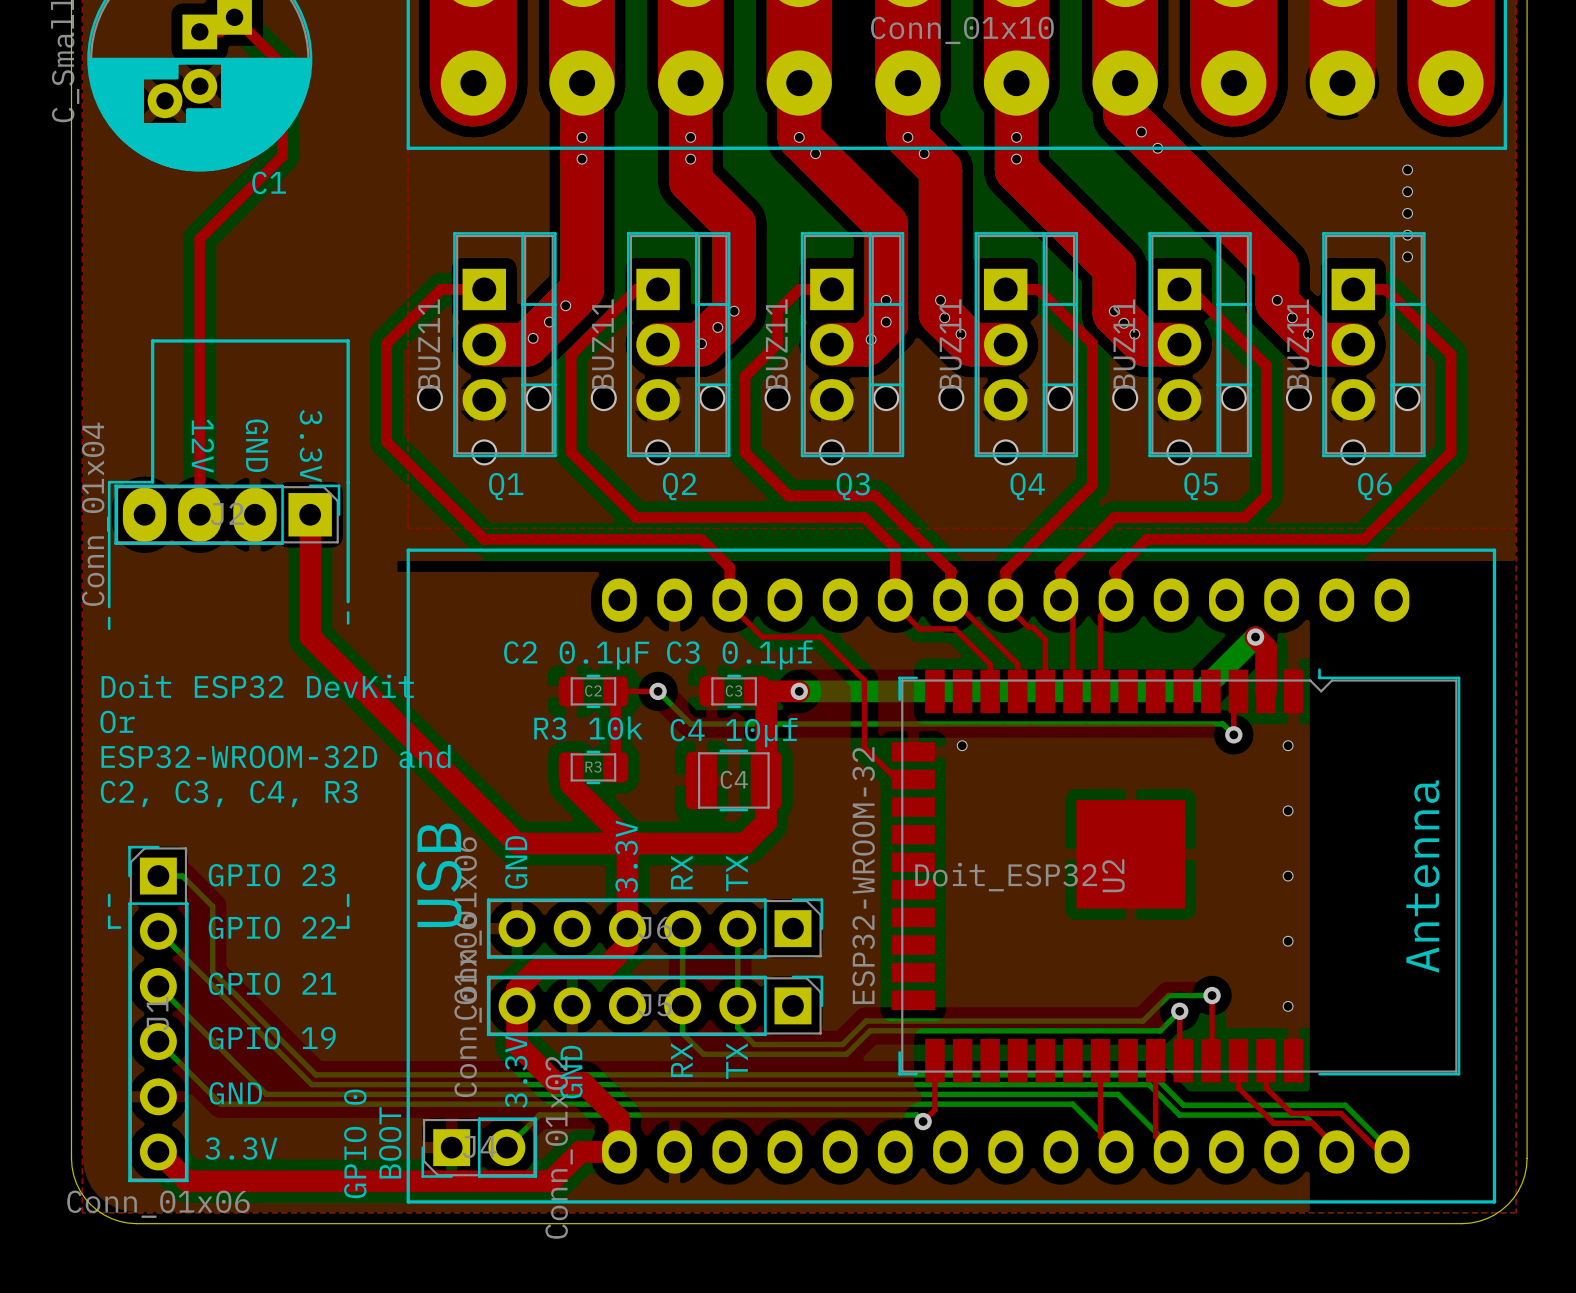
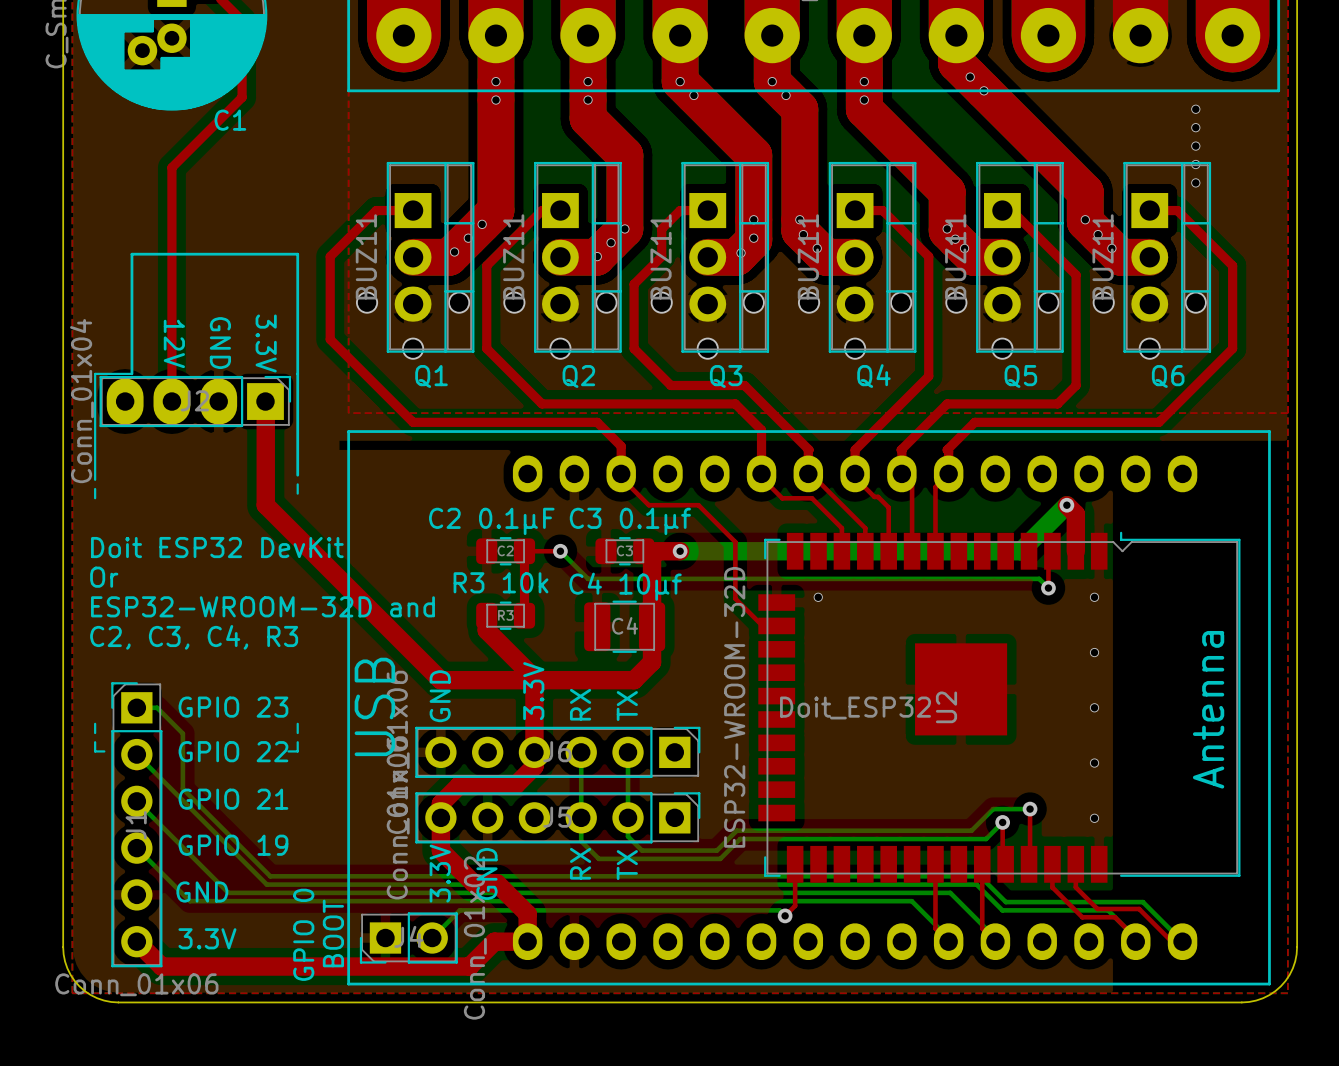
U2 value: ESP32-WROOM-32 (863, 875) -> ESP32-WROOM-32D (734, 707)

